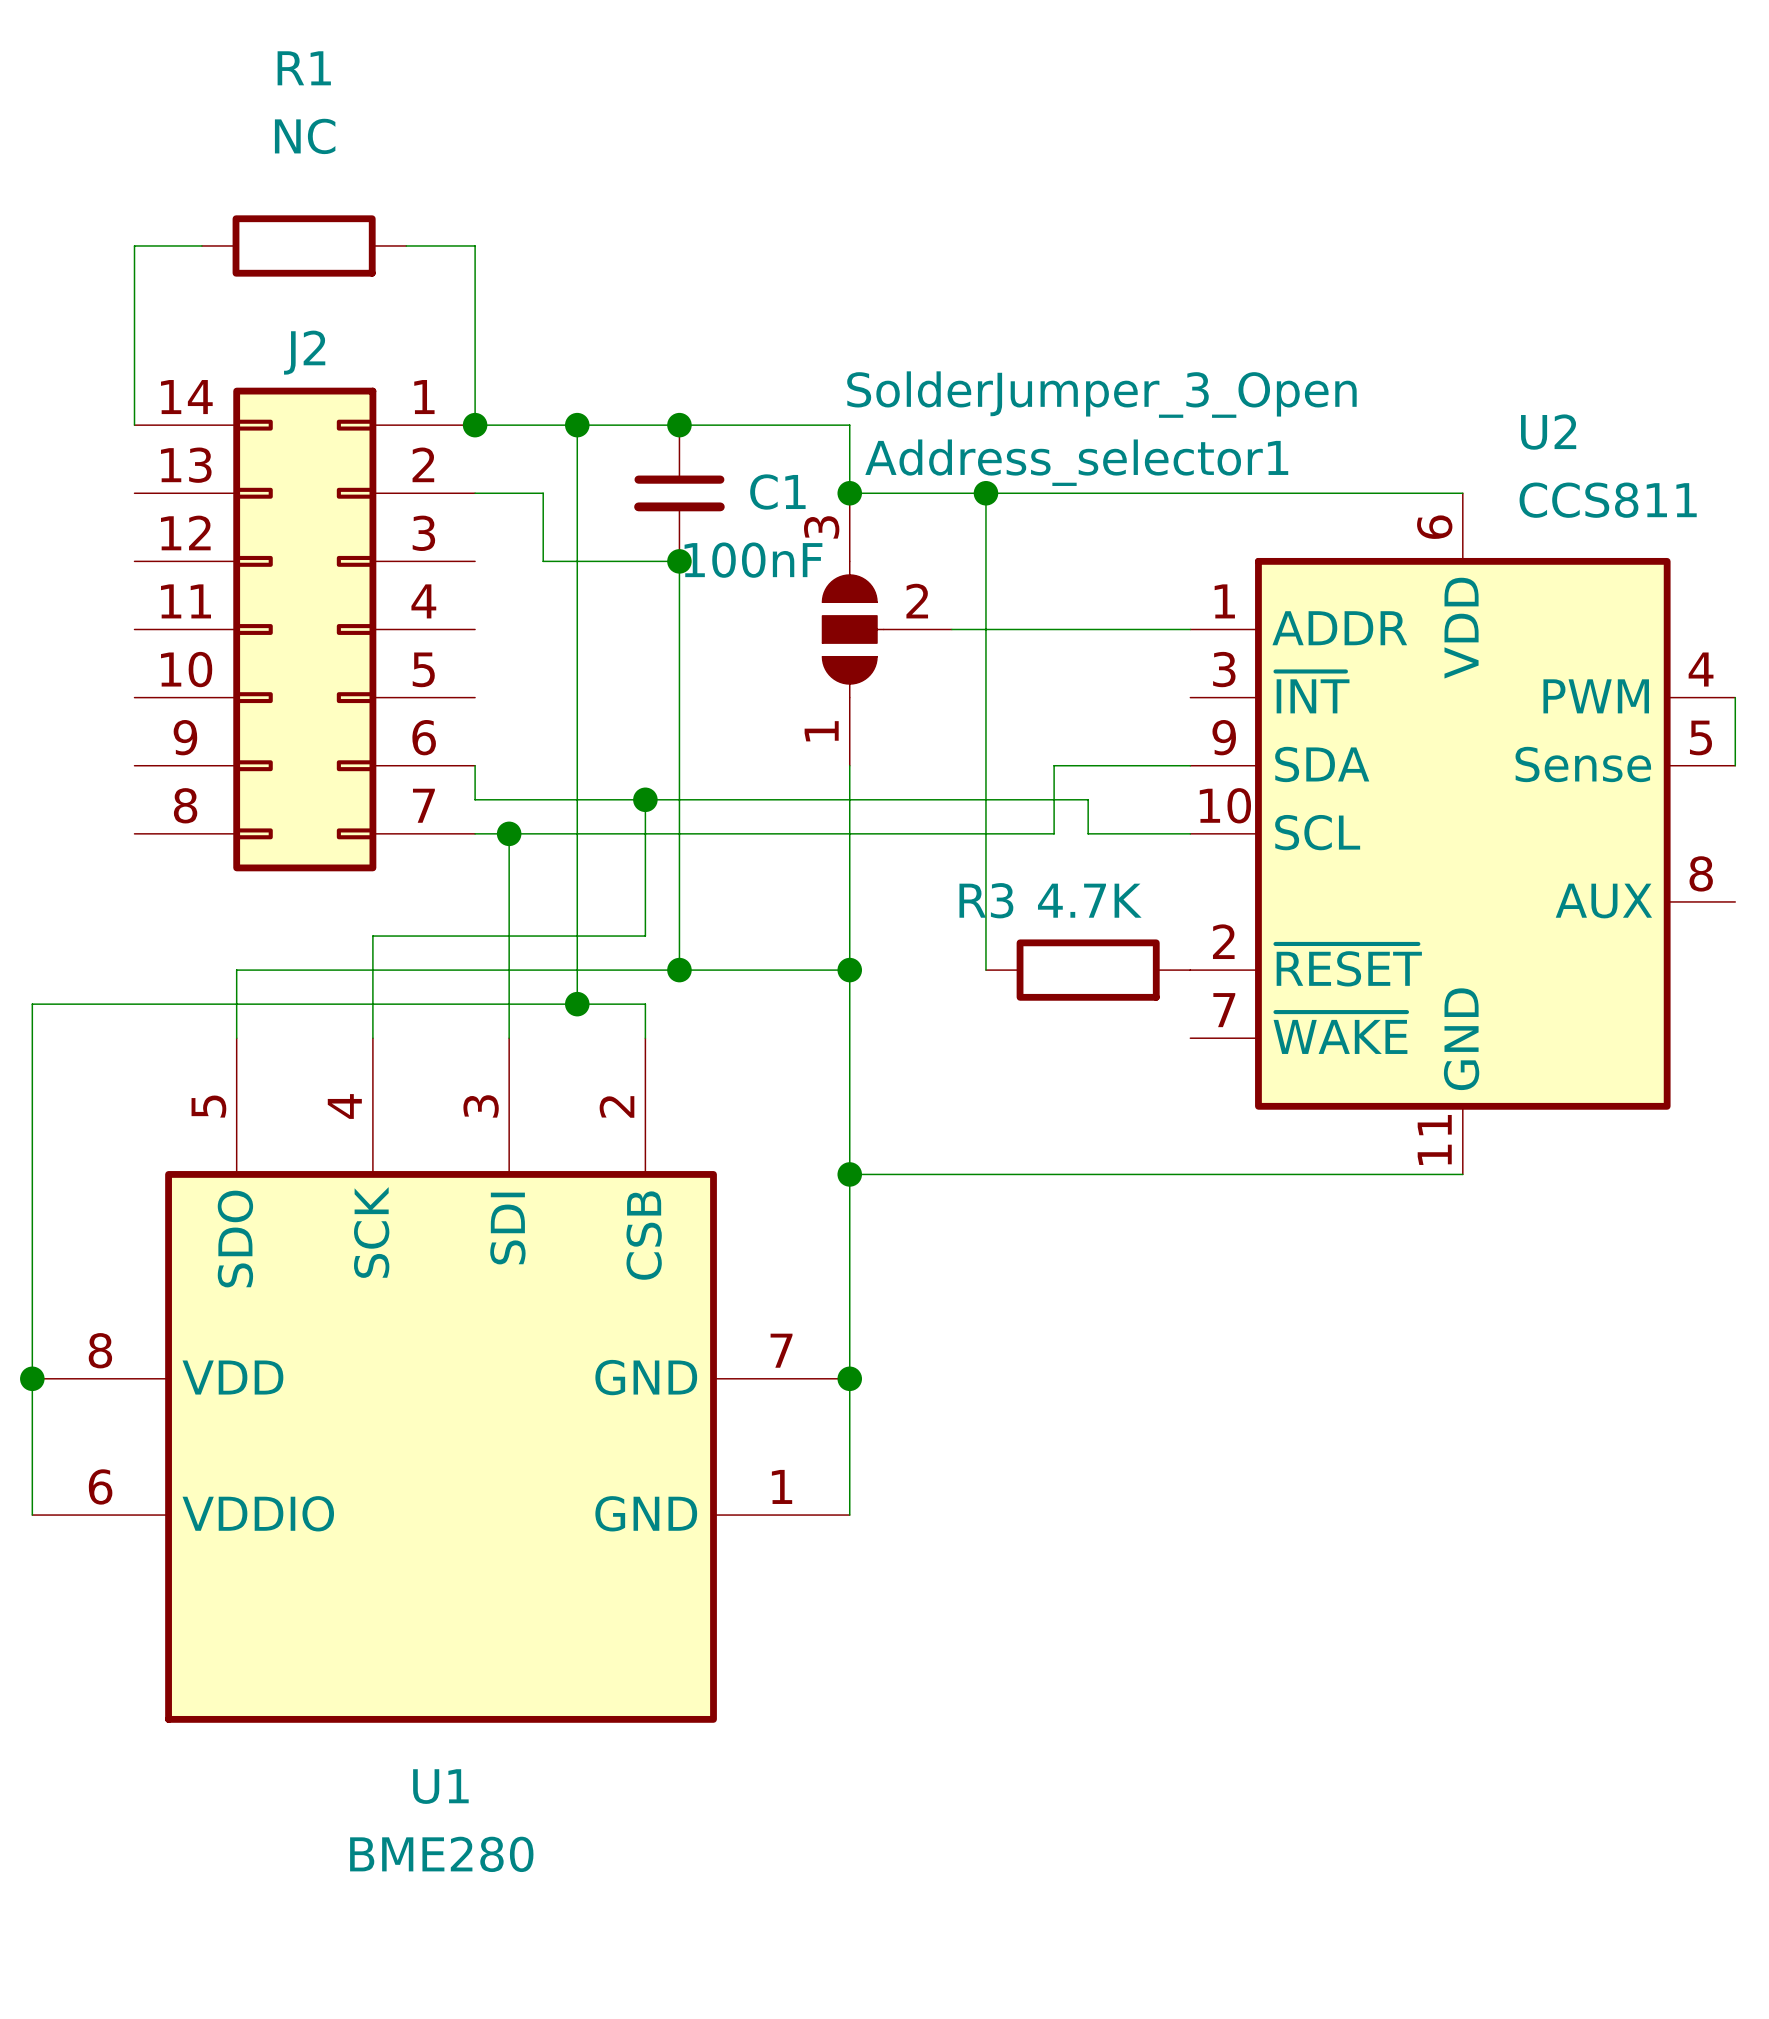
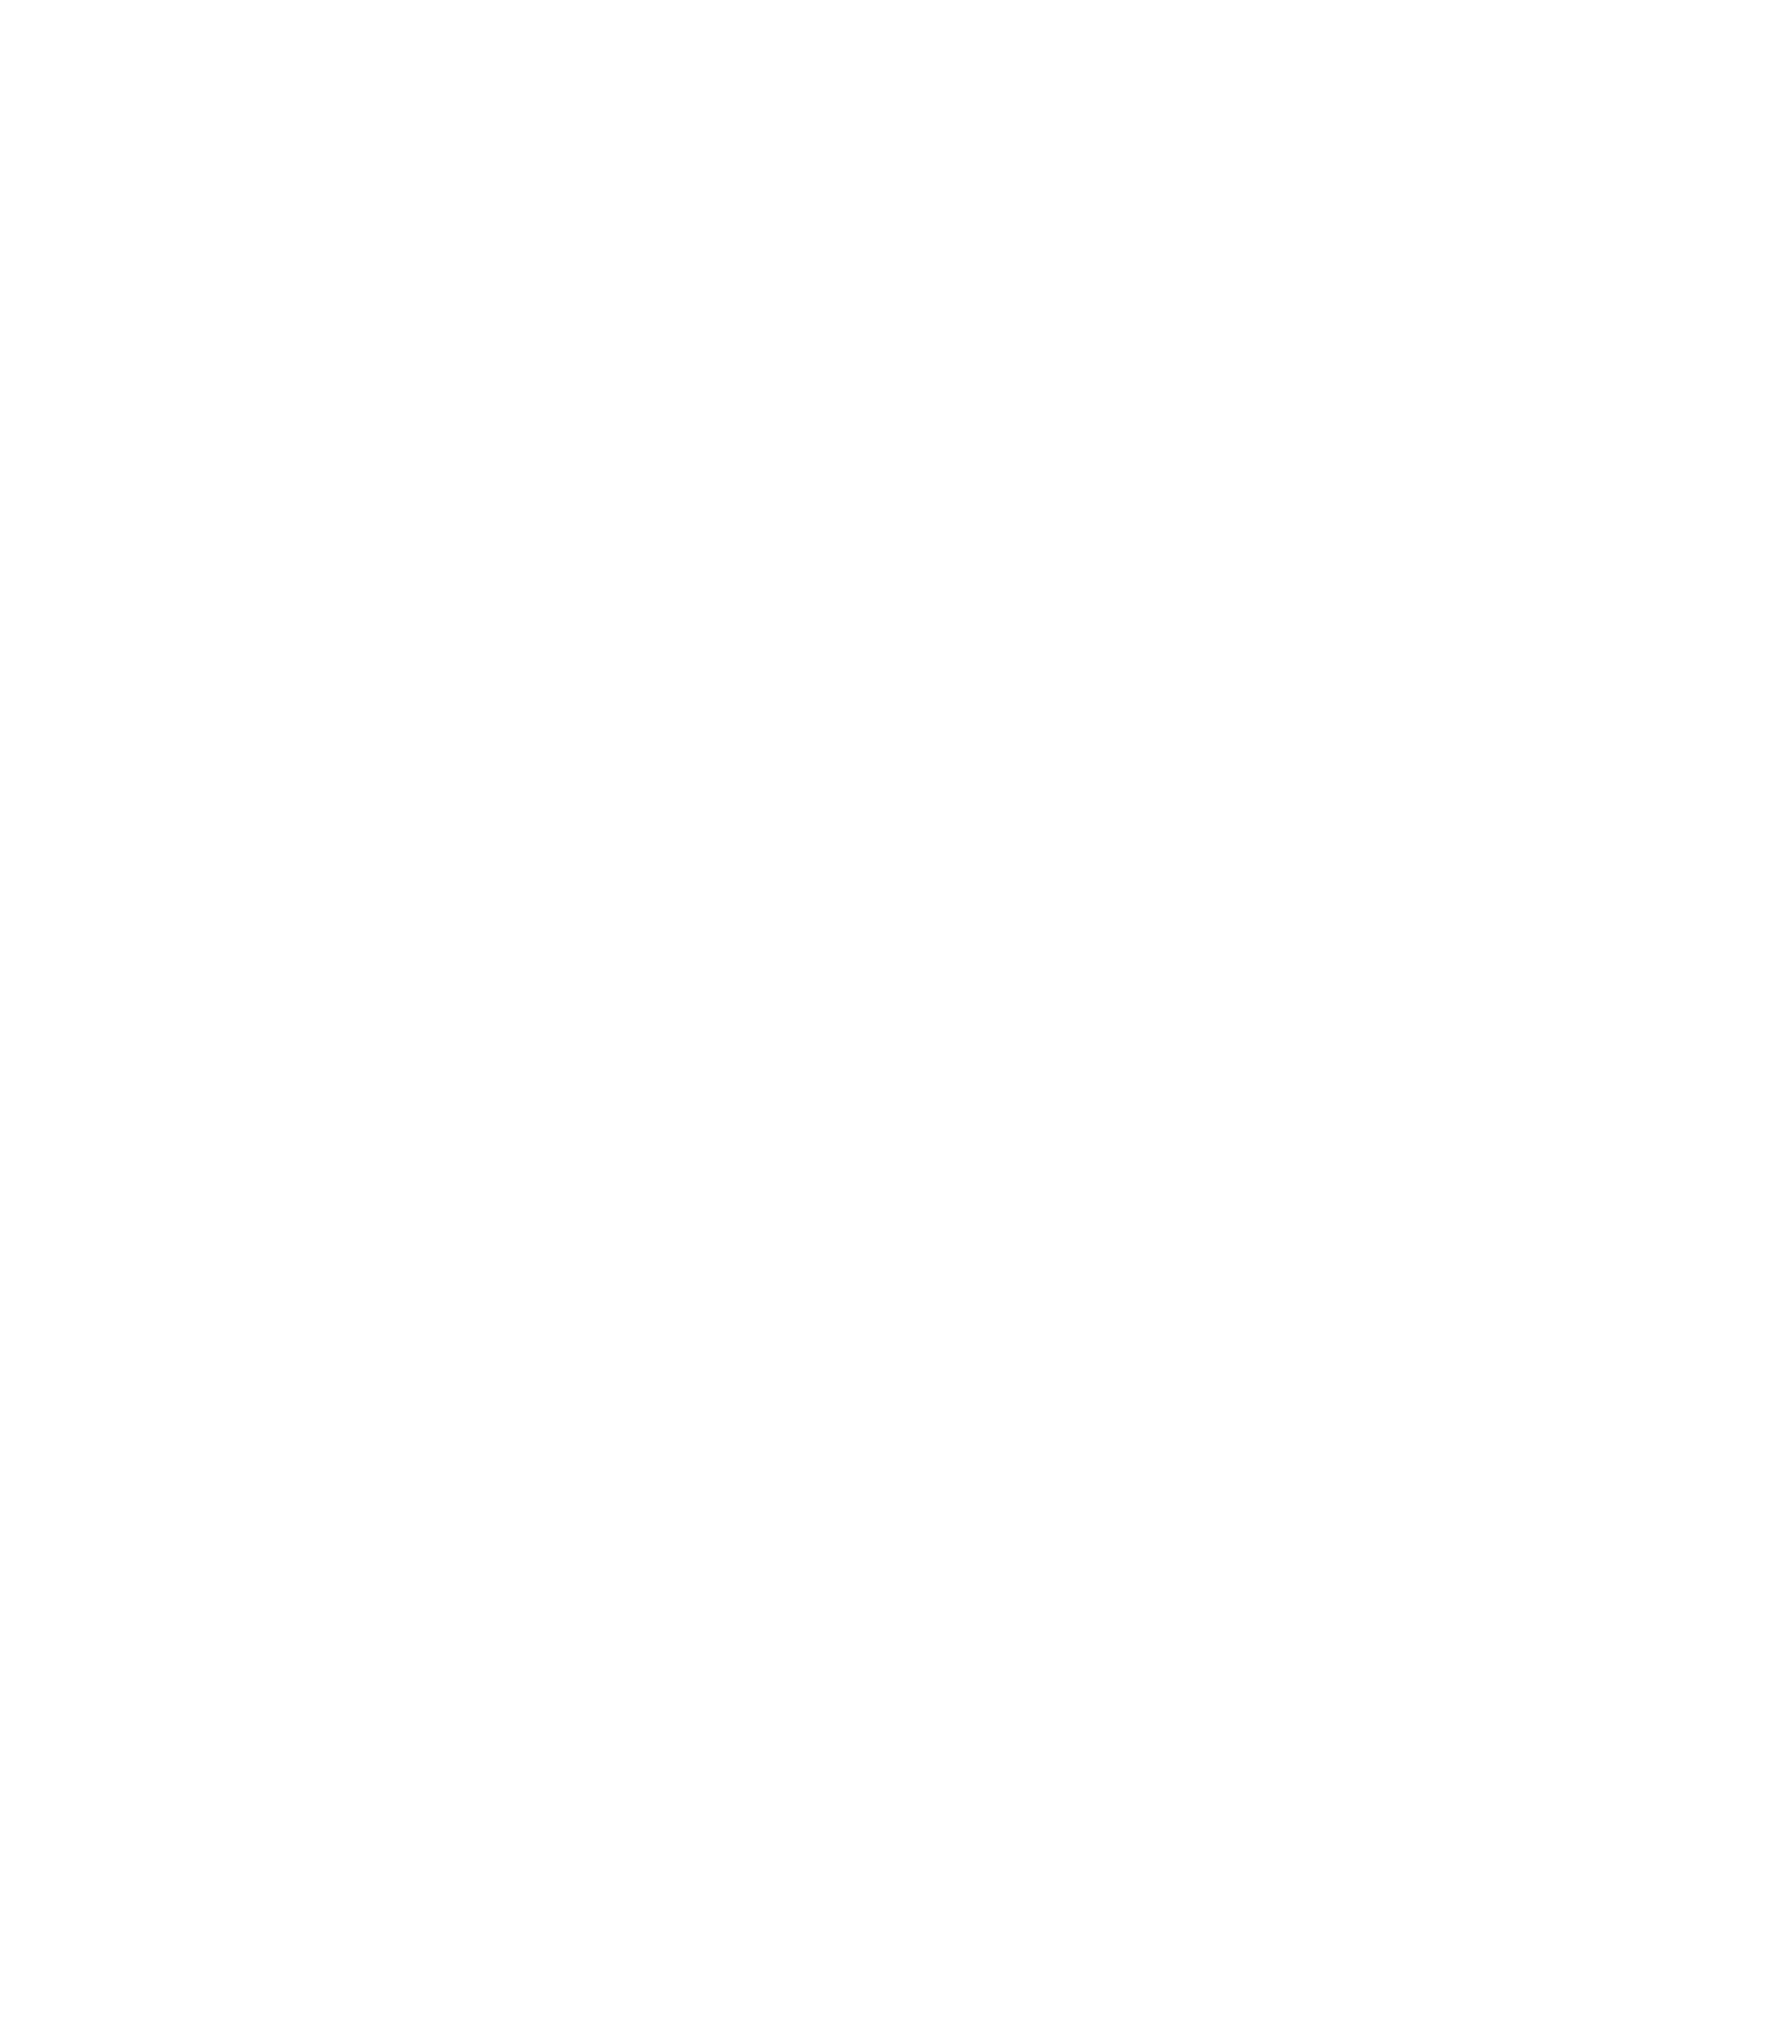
wire: (201, 245) (134, 245) (134, 425) -> none
R1: NC (304, 245) -> none
wire: (406, 245) (475, 245) (475, 425) (849, 425) (849, 493) (1462, 493) -> none
junction: (475, 425) -> none
wire: (577, 425) (577, 1004) -> none
junction: (577, 425) -> none
junction: (679, 425) -> none
wire: (475, 493) (543, 493) (543, 561) (679, 561) (679, 970) -> none
C1: 100nF (679, 493) -> none
junction: (849, 493) -> none
wire: (985, 493) (985, 970) -> none
junction: (985, 493) -> none
junction: (679, 561) -> none
J2: (304, 629) -> none
Address_selector1: SolderJumper_3_Open (887, 629) -> none
wire: (951, 629) (1190, 629) -> none
wire: (1735, 697) (1735, 765) -> none
wire: (475, 765) (475, 799) (1088, 799) (1088, 833) (1190, 833) -> none
wire: (849, 765) (849, 1515) -> none
wire: (1190, 765) (1054, 765) (1054, 833) (475, 833) -> none
wire: (645, 799) (645, 936) (372, 936) (372, 1038) -> none
junction: (645, 799) -> none
wire: (509, 833) (509, 1038) -> none
junction: (509, 833) -> none
U2: CCS811 (1462, 833) -> none
junction: (679, 970) -> none
wire: (849, 970) (236, 970) (236, 1038) -> none
junction: (849, 970) -> none
R3: 4.7K (1088, 970) -> none
junction: (577, 1004) -> none
wire: (645, 1038) (645, 1004) (32, 1004) (32, 1515) -> none
wire: (849, 1174) (1462, 1174) -> none
junction: (849, 1174) -> none
junction: (32, 1378) -> none
junction: (849, 1378) -> none
U1: BME280 (441, 1380) -> none

